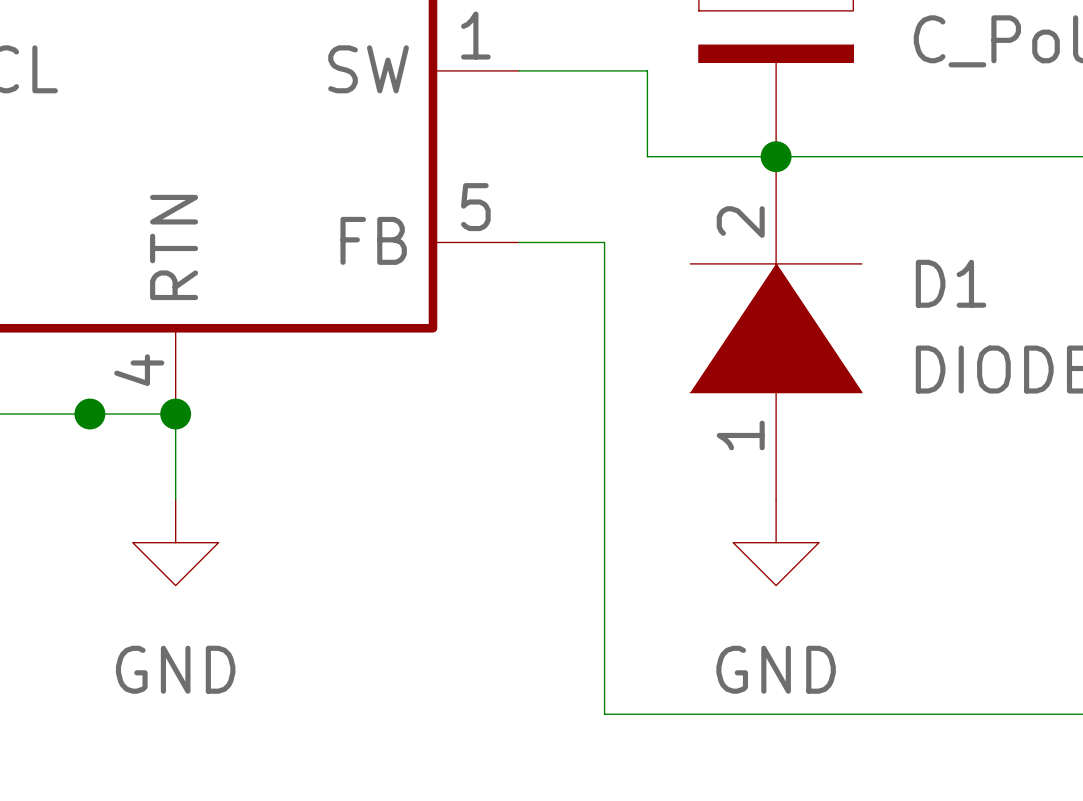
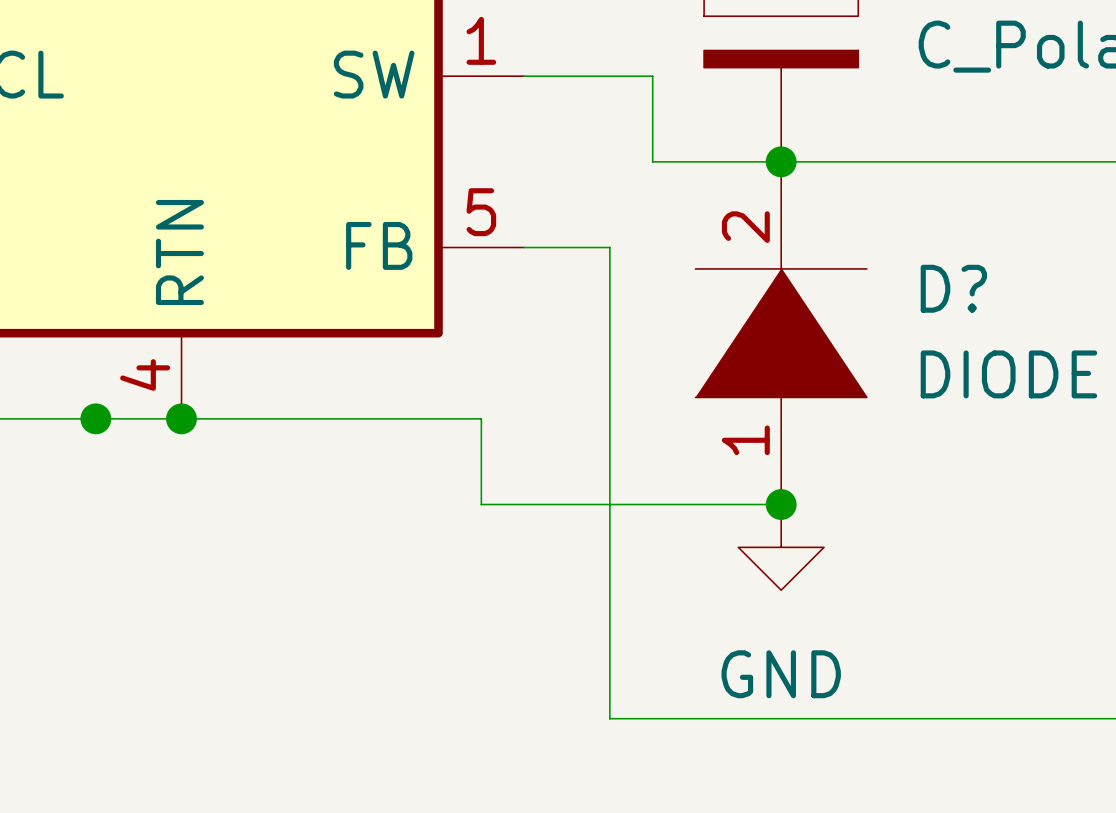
D1 name: D1 (951, 283) -> D? (953, 288)
wire: (175, 414) (175, 499) -> (181, 418) (481, 418) (481, 504) (781, 504)
junction: none -> (781, 504)
power symbol: GND (175, 542) -> none

